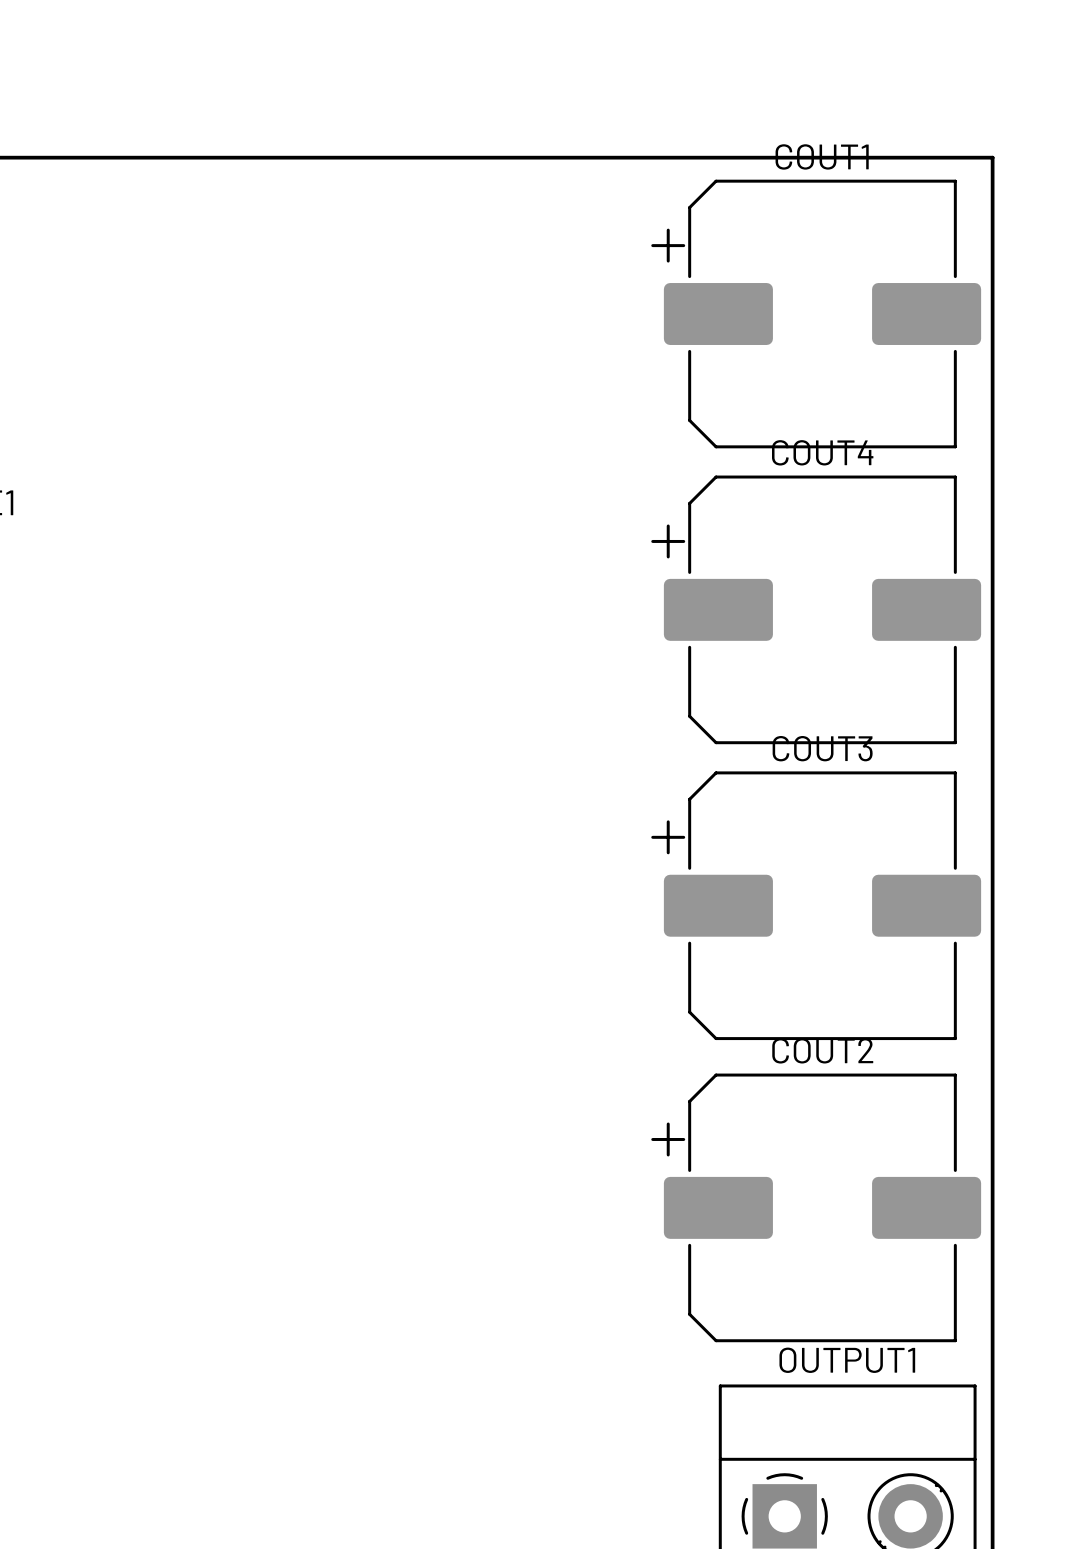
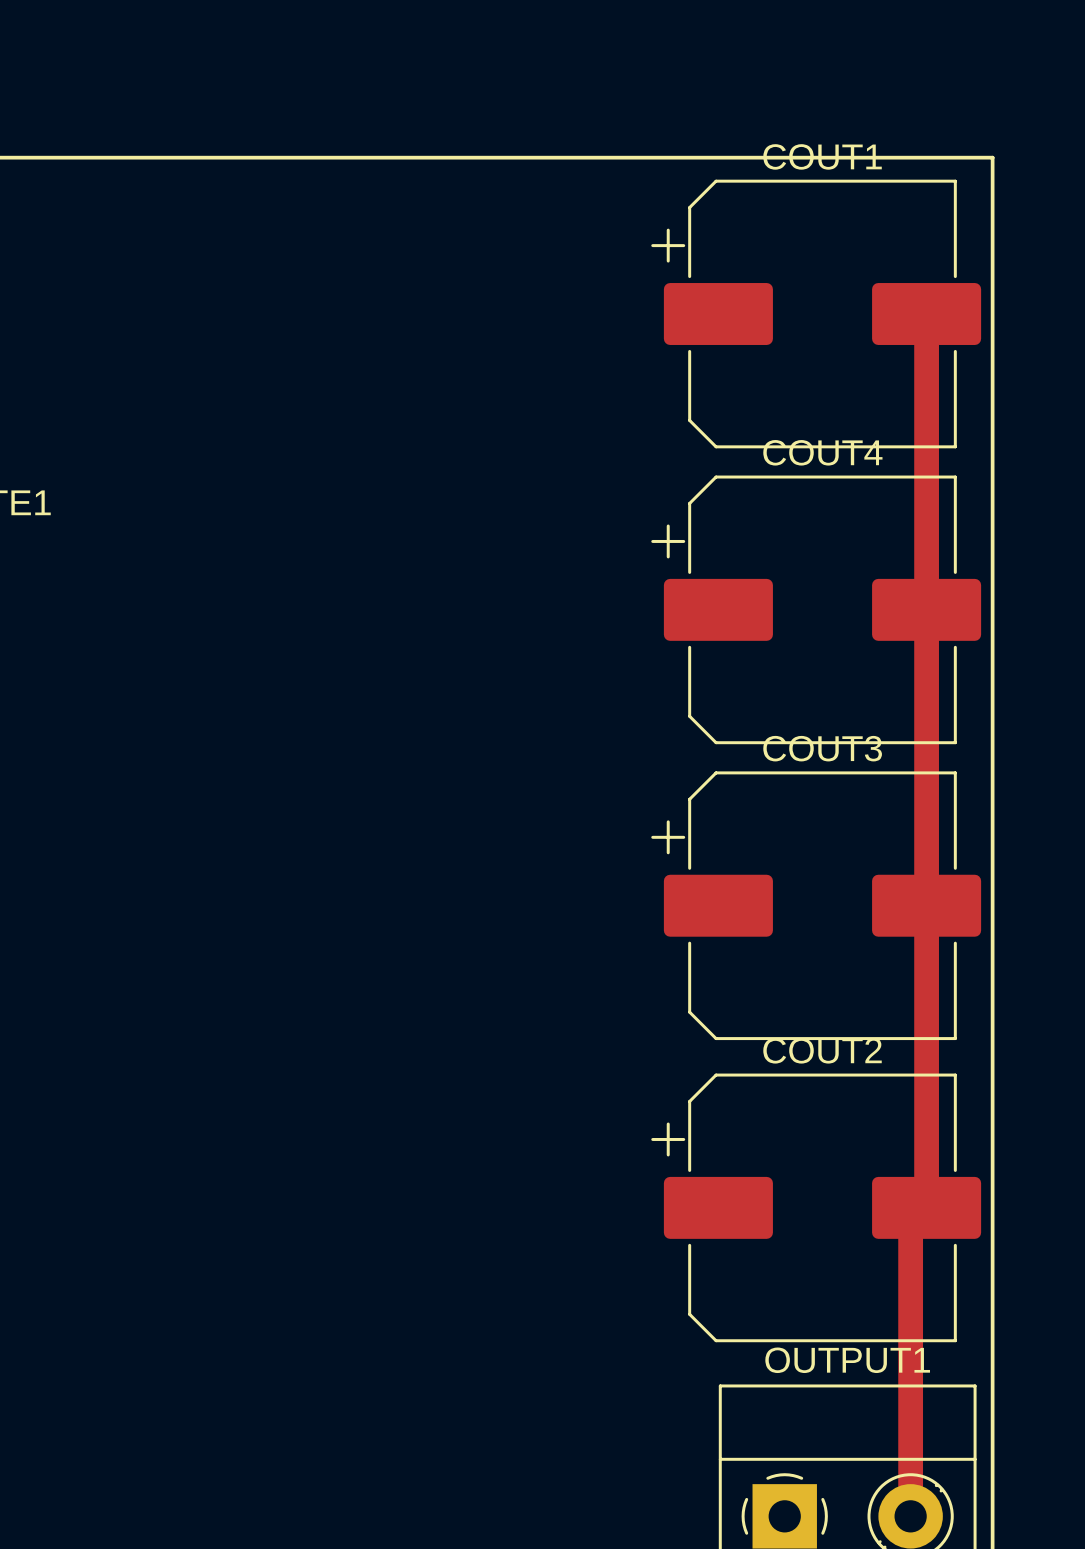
track: none -> (926, 314) (926, 1207) (910, 1223) (910, 1516)

